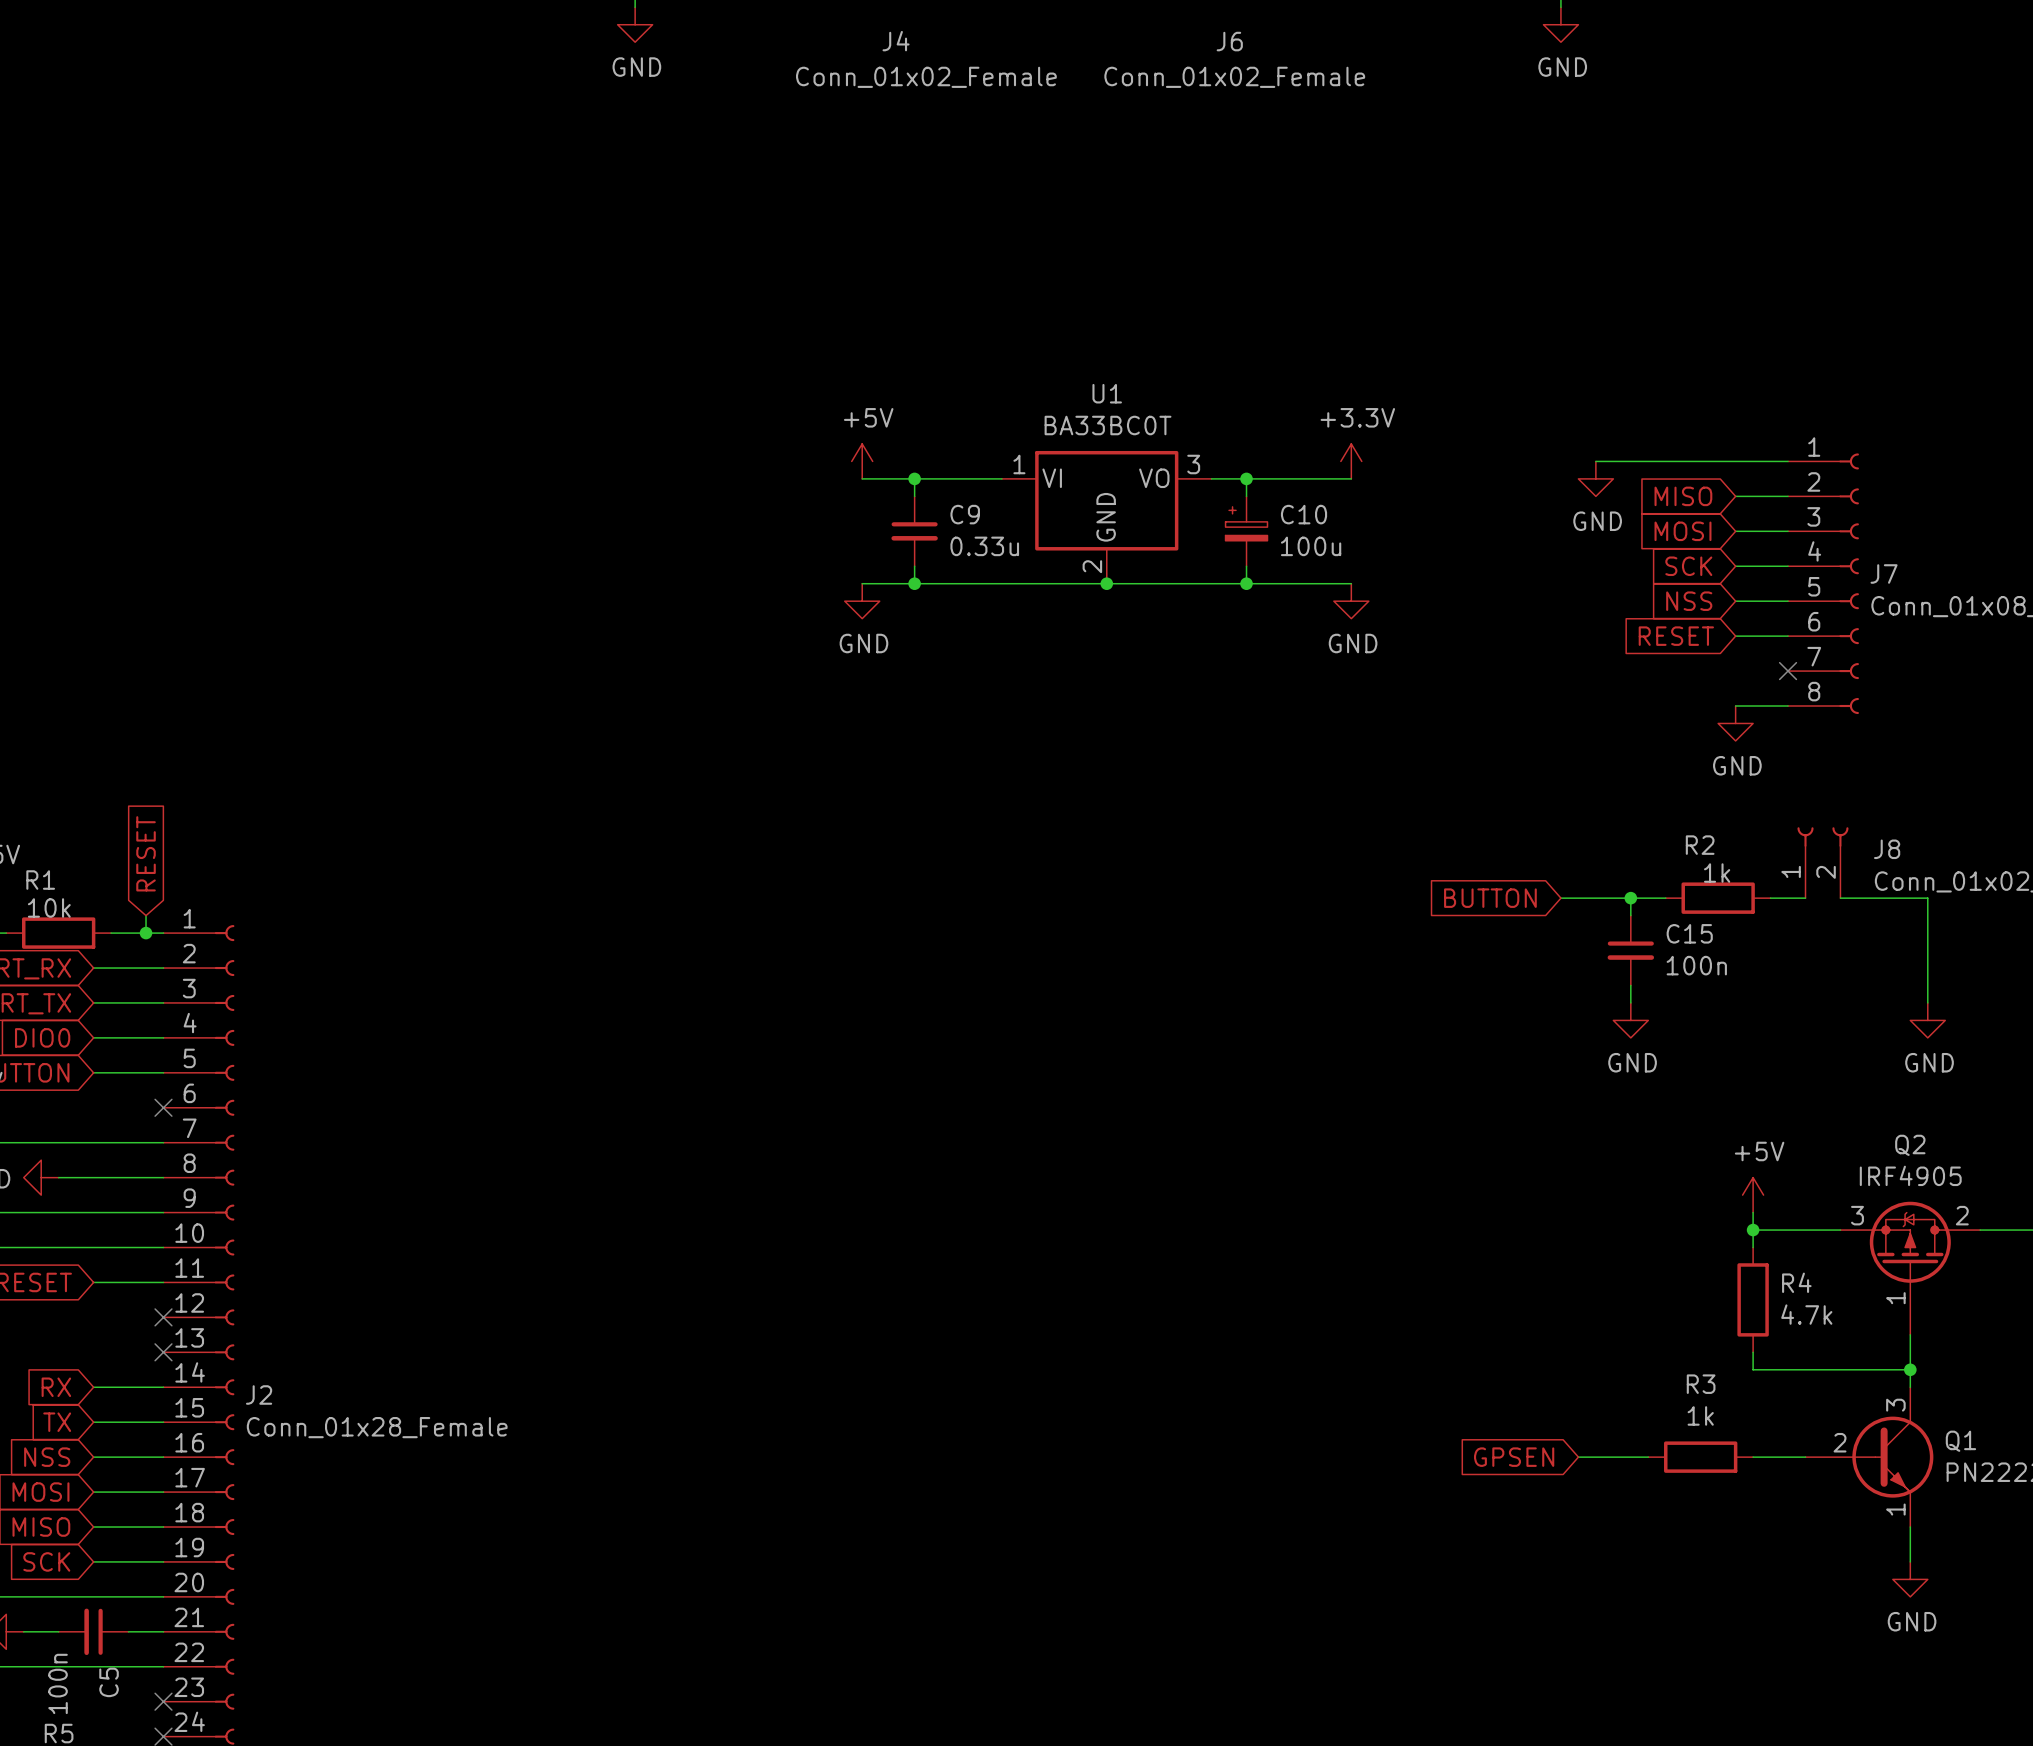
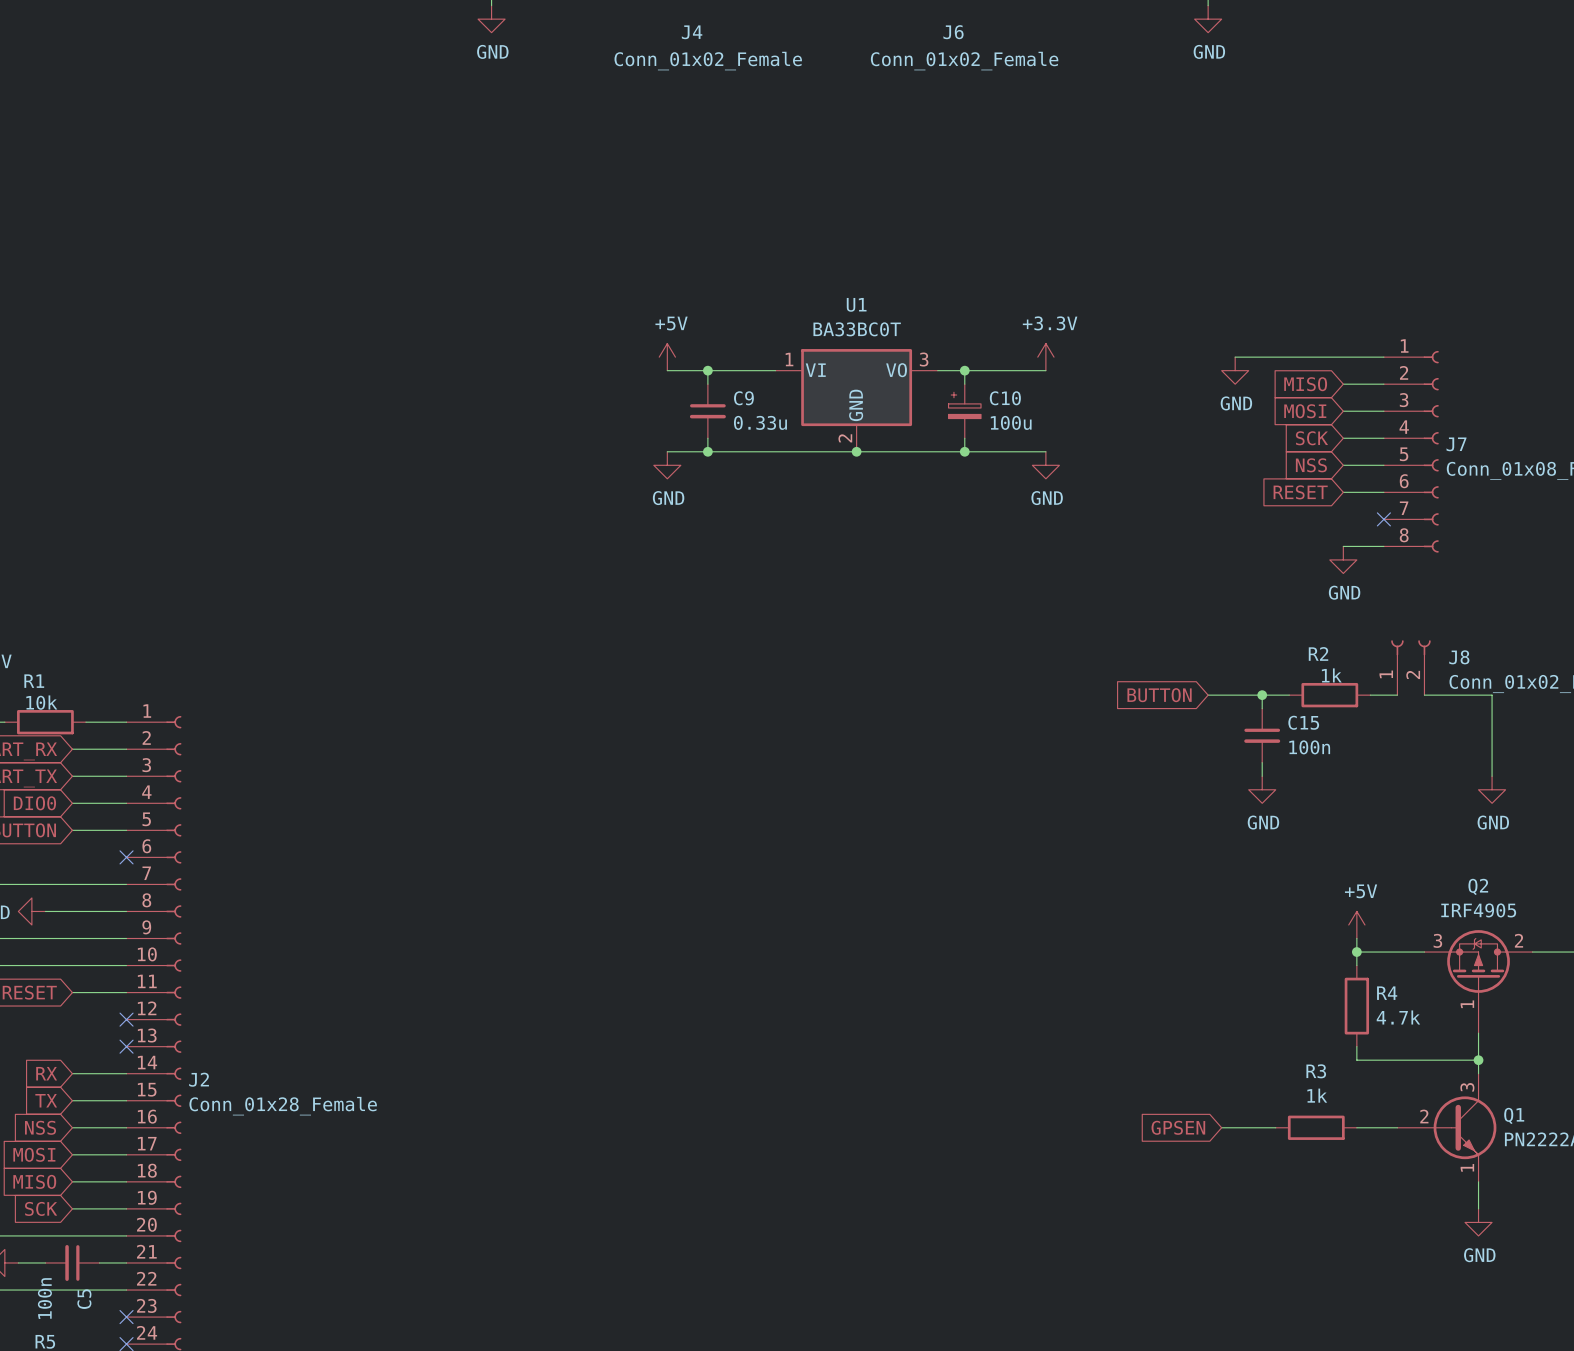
global label: RESET (146, 853) -> none
wire: (146, 915) (146, 933) -> none
junction: (146, 933) -> none

